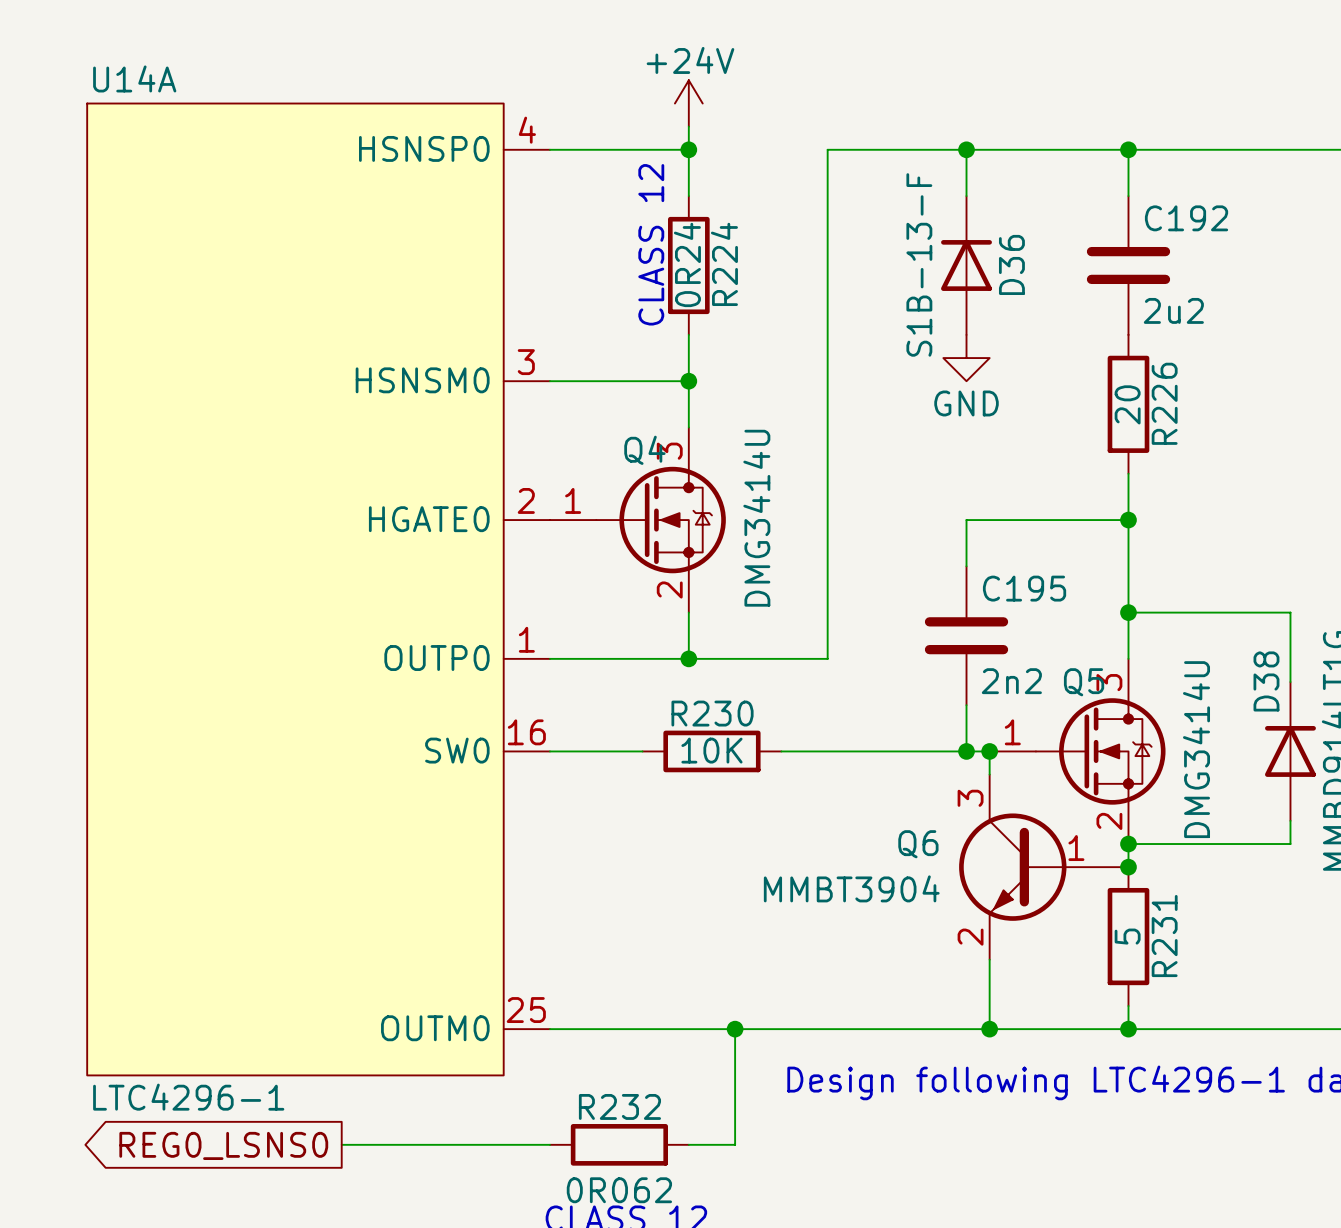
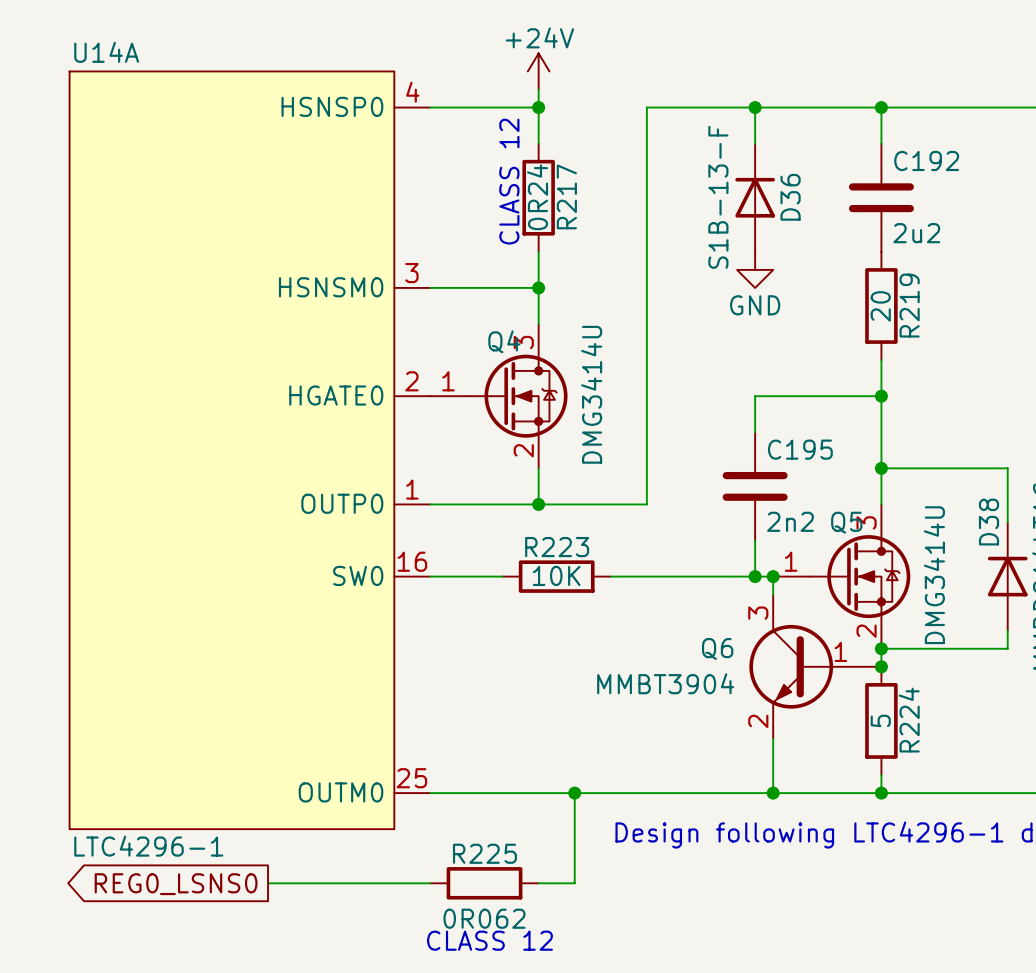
R224 name: R224 (724, 264) -> R217 (566, 196)
R226 name: R226 (1164, 403) -> R219 (909, 305)
R230 name: R230 (712, 713) -> R223 (557, 547)
R231 name: R231 (1164, 936) -> R224 (909, 720)
R232 name: R232 (619, 1106) -> R225 (484, 853)

